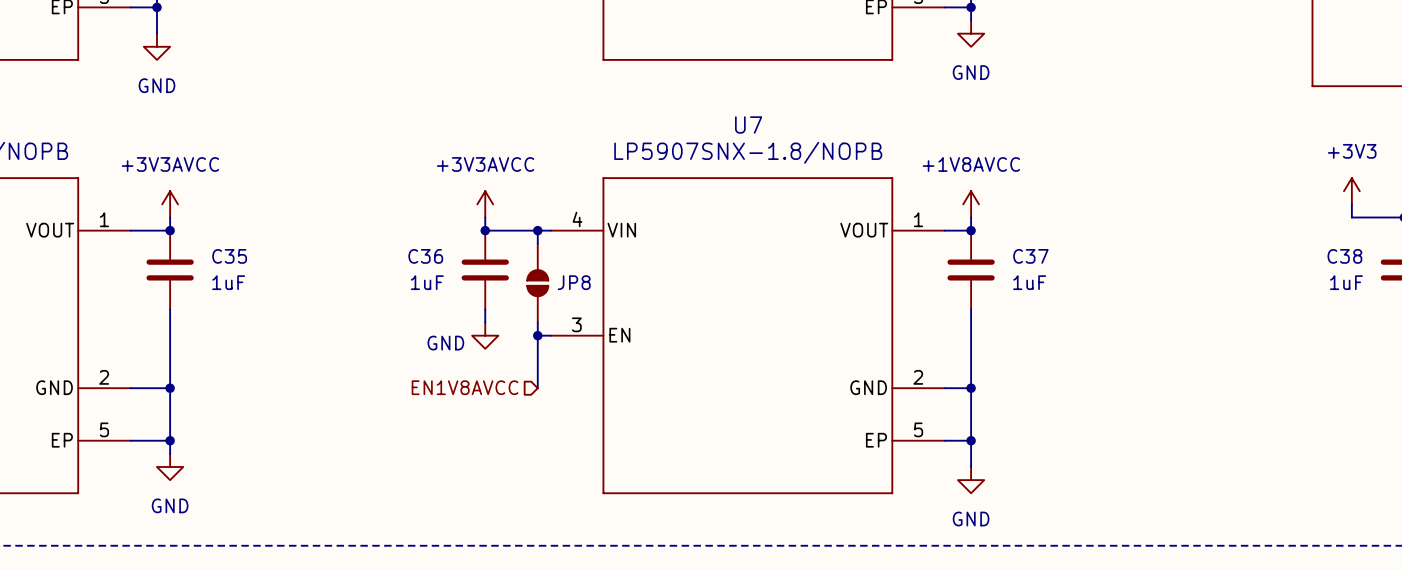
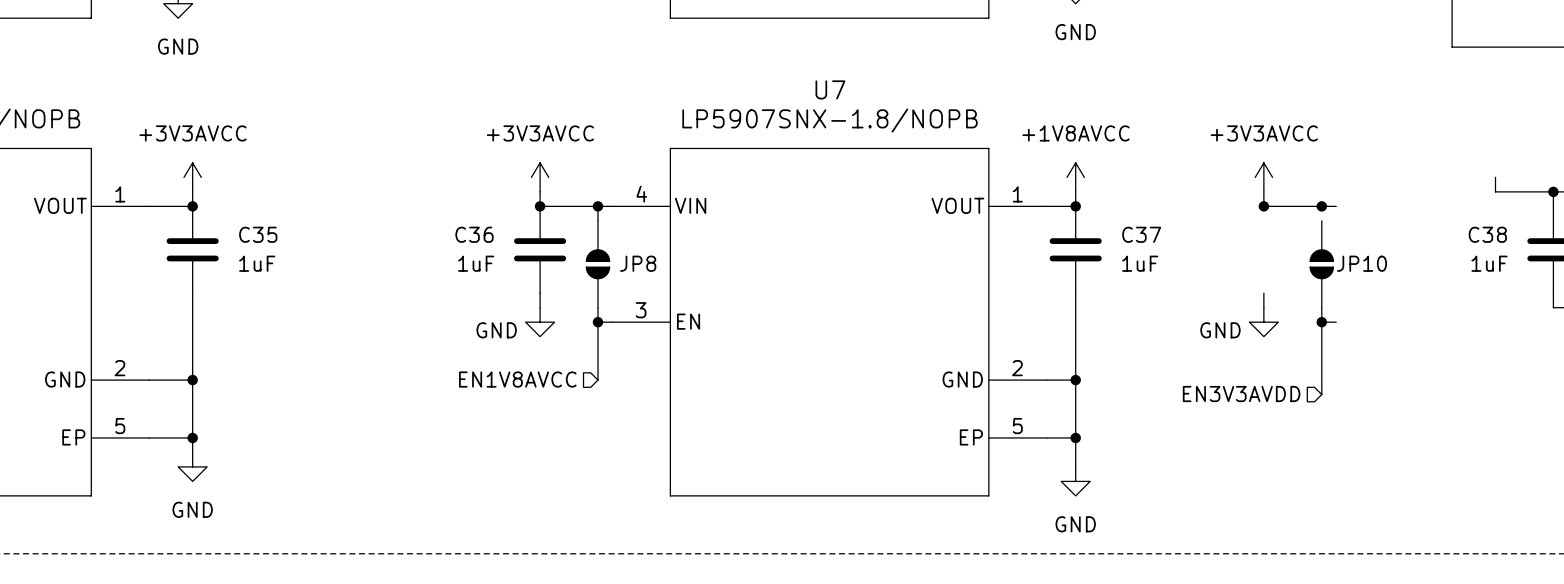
power symbol: +3V3 (1351, 191) -> none
power symbol: none -> +3V3AVCC (1263, 177)
wire: none -> (1263, 191) (1263, 206) (1336, 206)
junction: none -> (1263, 206)
junction: none -> (1321, 206)
JP10: none -> (1321, 264)
wire: none -> (1263, 293) (1263, 307)
wire: none -> (1321, 307) (1321, 394)
power symbol: none -> GND (1263, 322)
wire: none -> (1321, 322) (1336, 322)
junction: none -> (1321, 322)
hierarchical label: none -> EN3V3AVDD (1241, 394)

